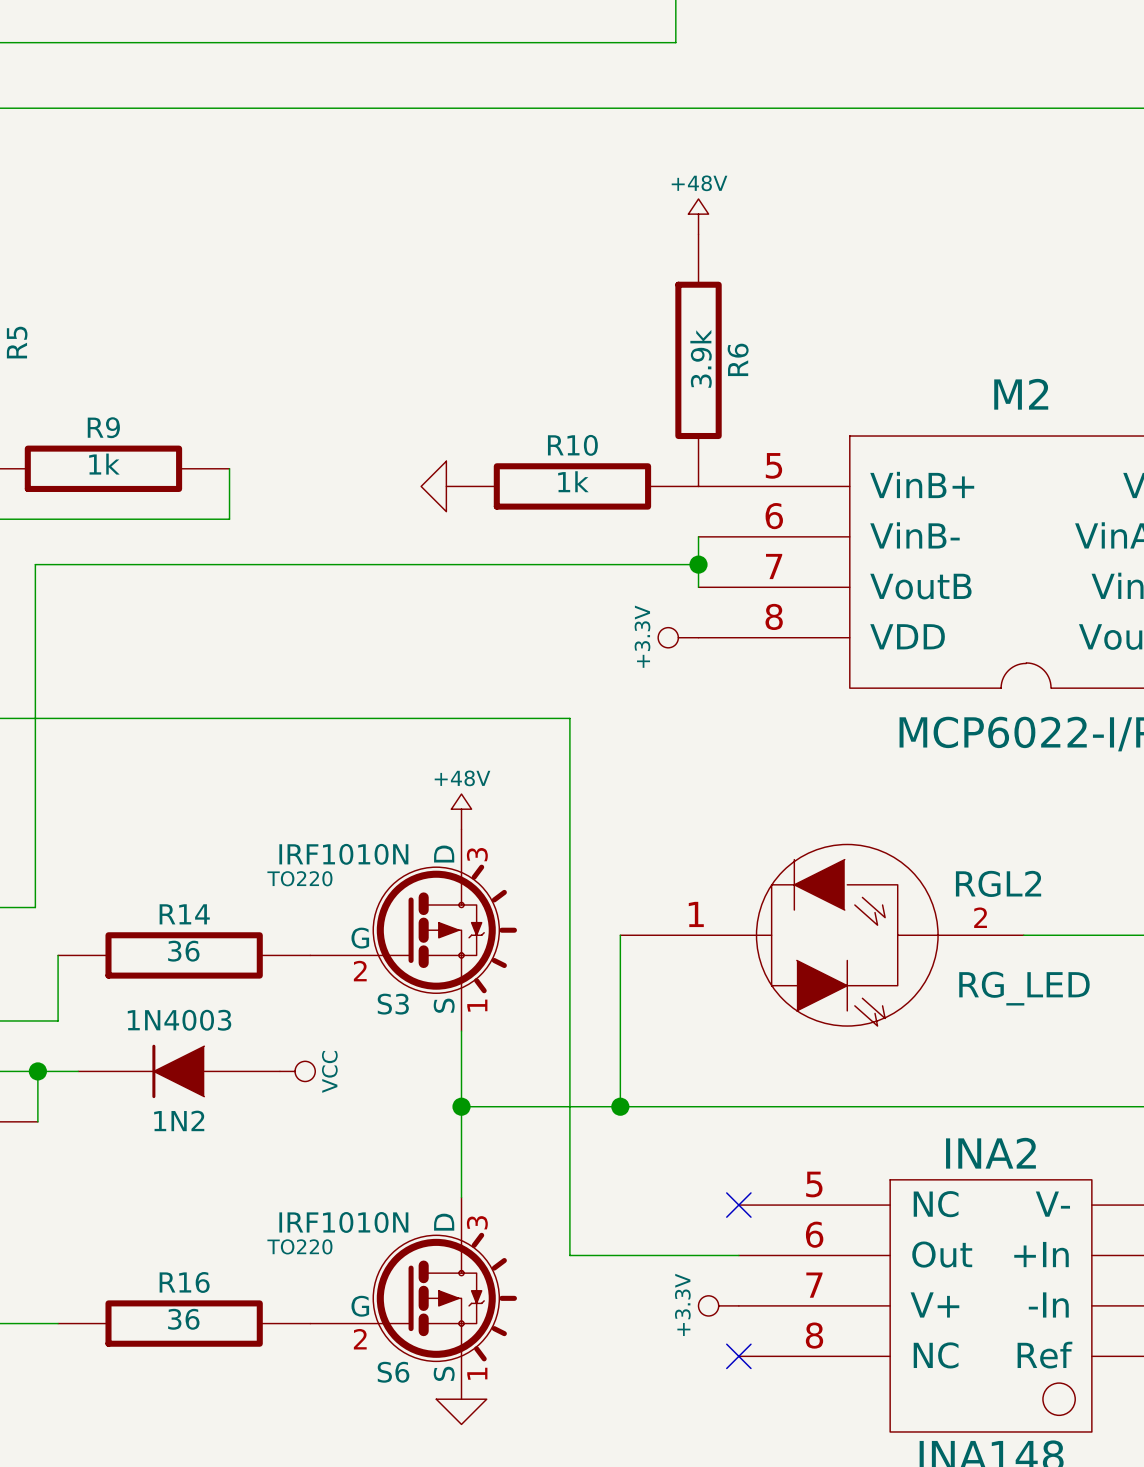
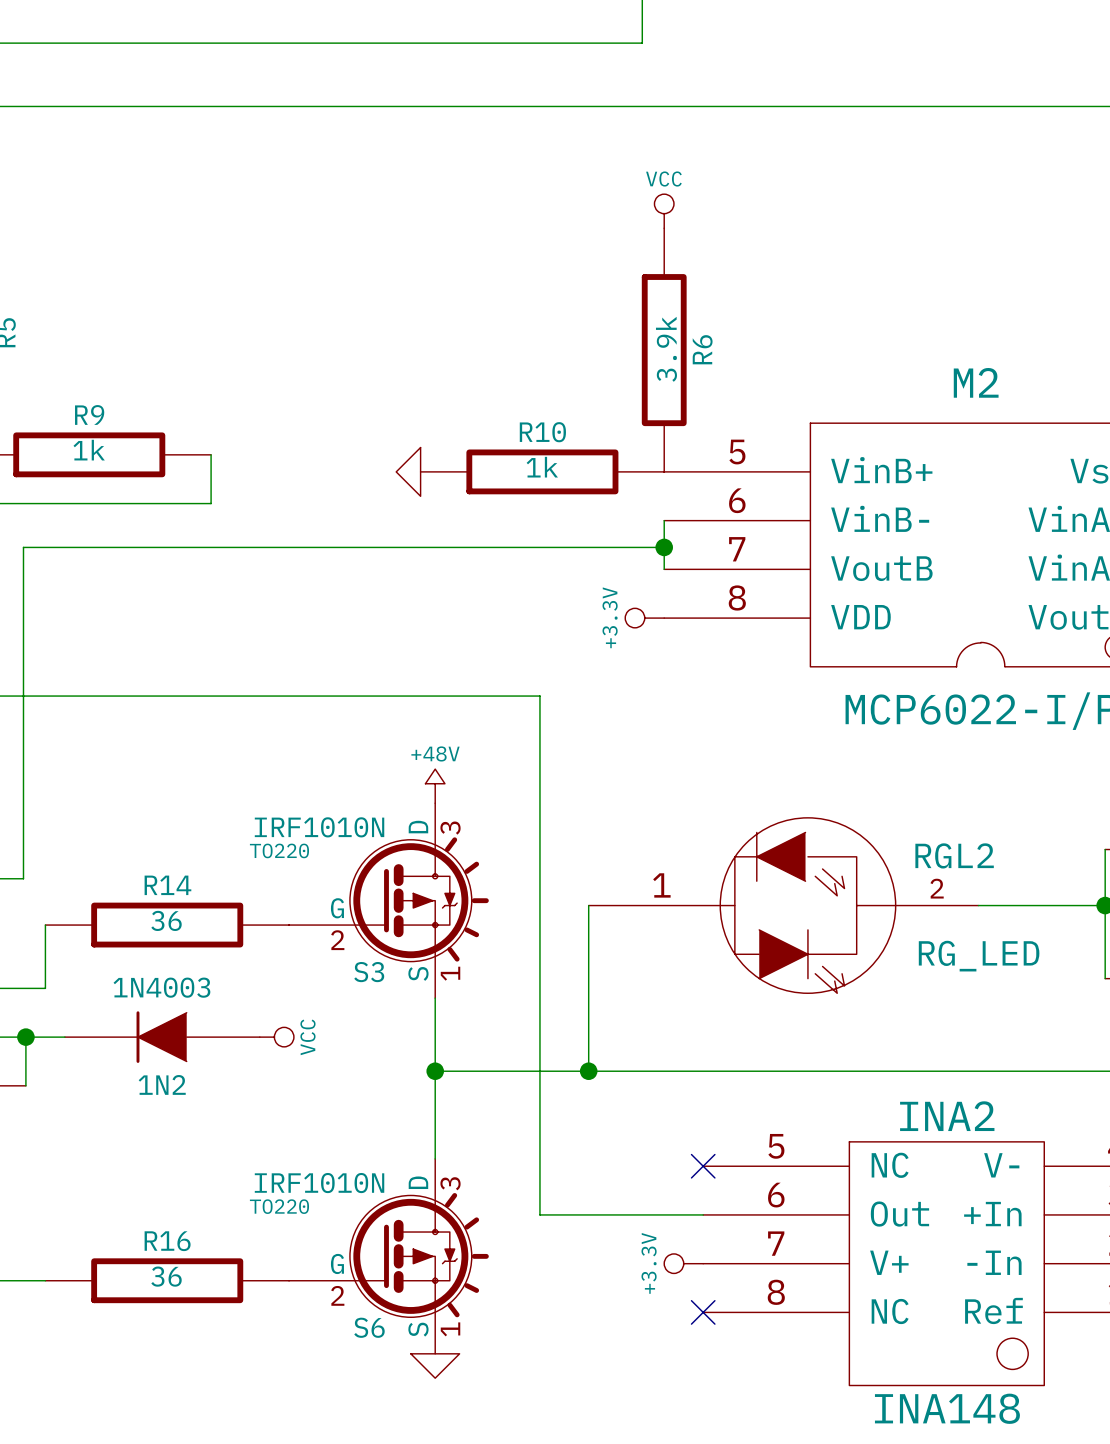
power symbol: +48V (698, 216) -> VCC (664, 211)

